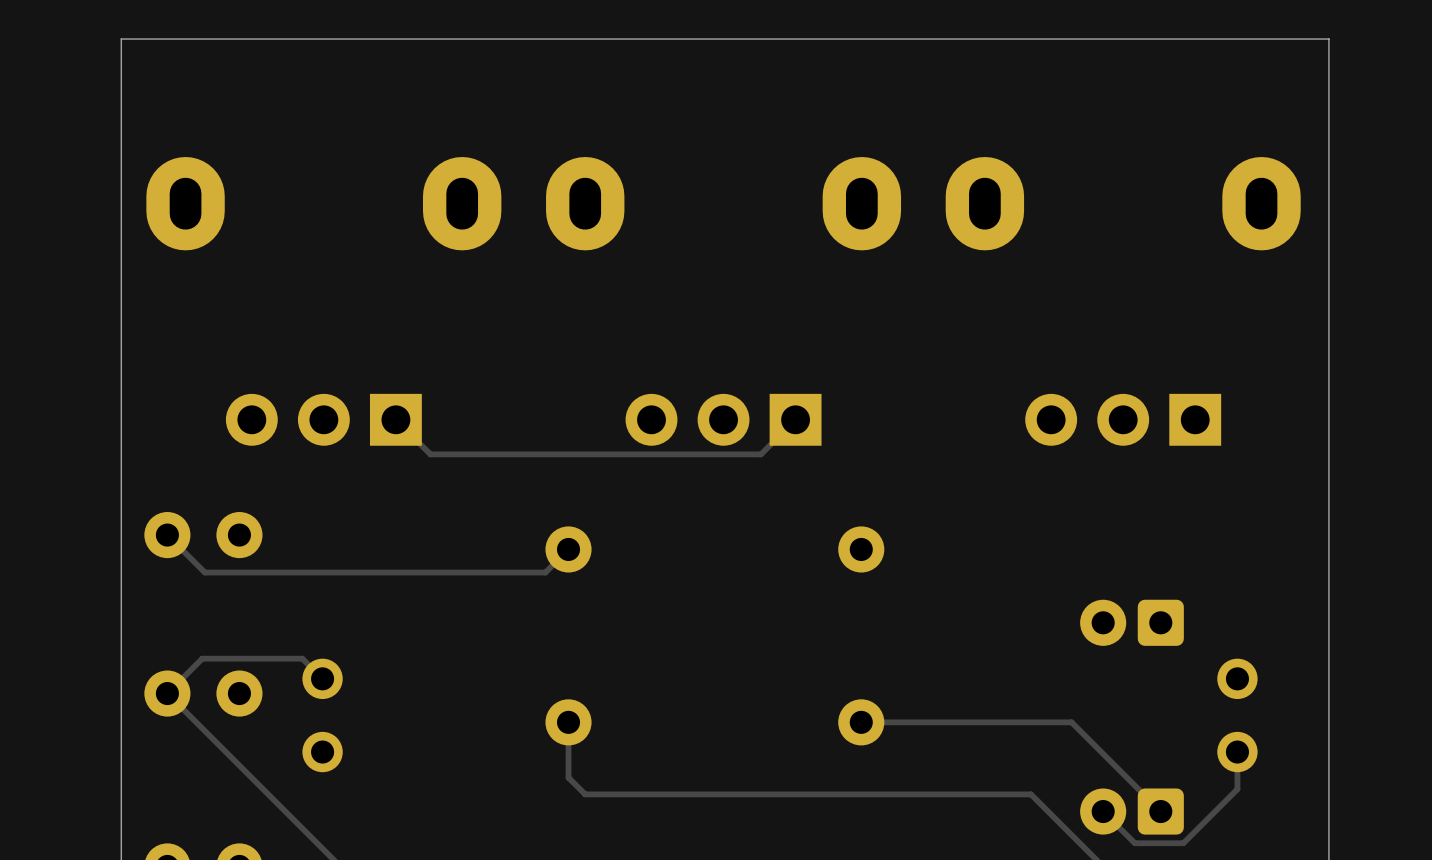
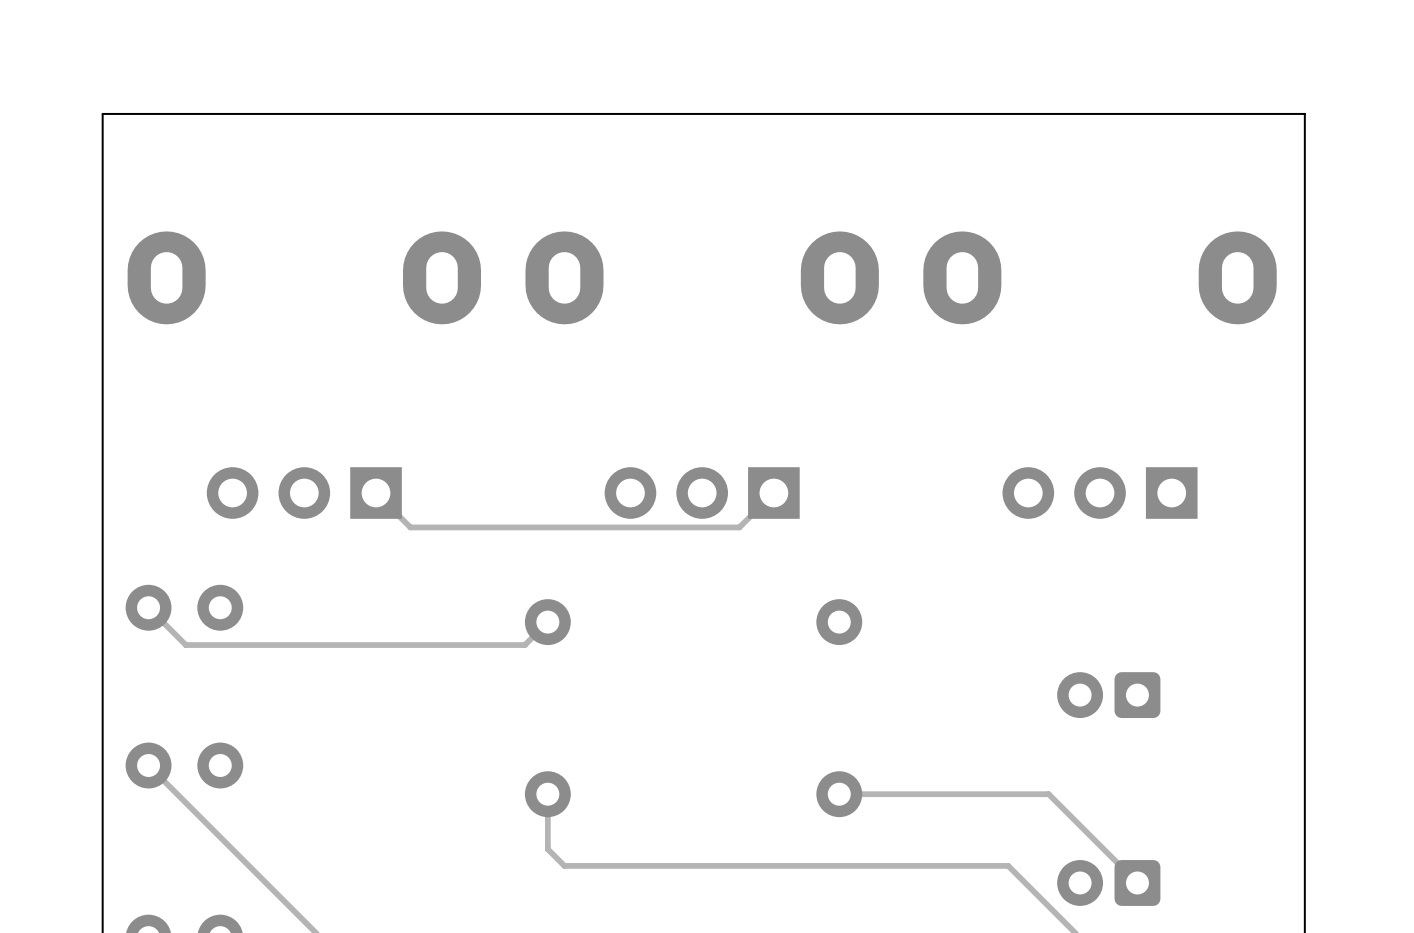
track: (322, 678) (302, 658) (202, 658) (167, 693) -> none
part: (322, 715) -> none
part: (1237, 715) -> none
track: (1237, 752) (1237, 789) (1183, 843) (1134, 843) (1103, 811) -> none

